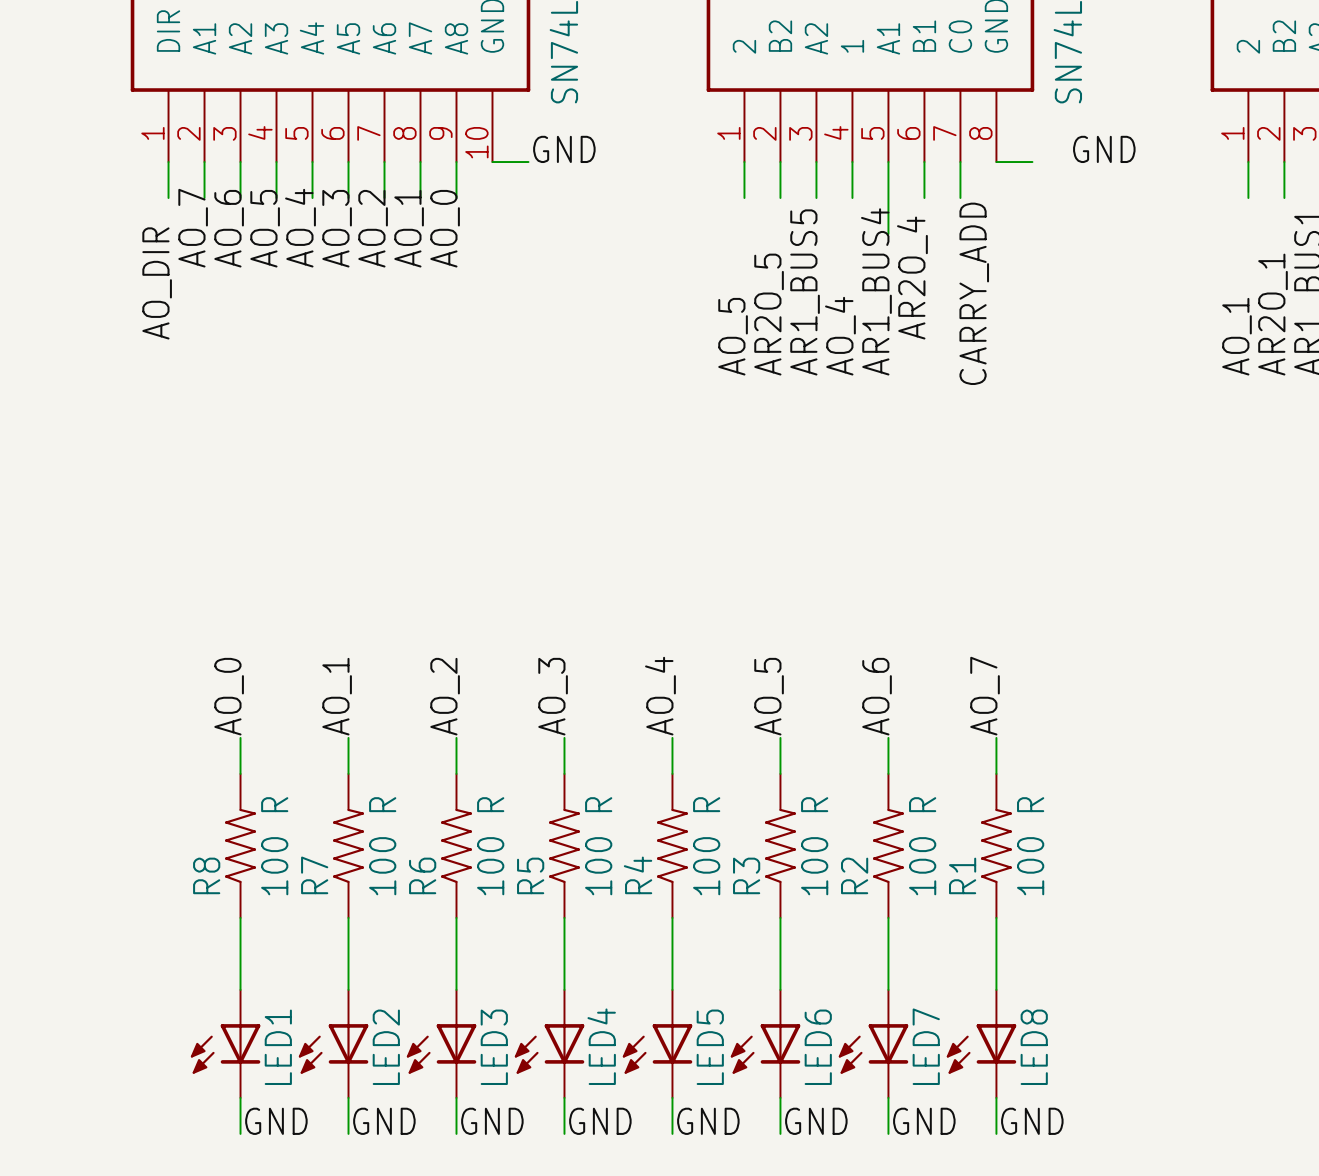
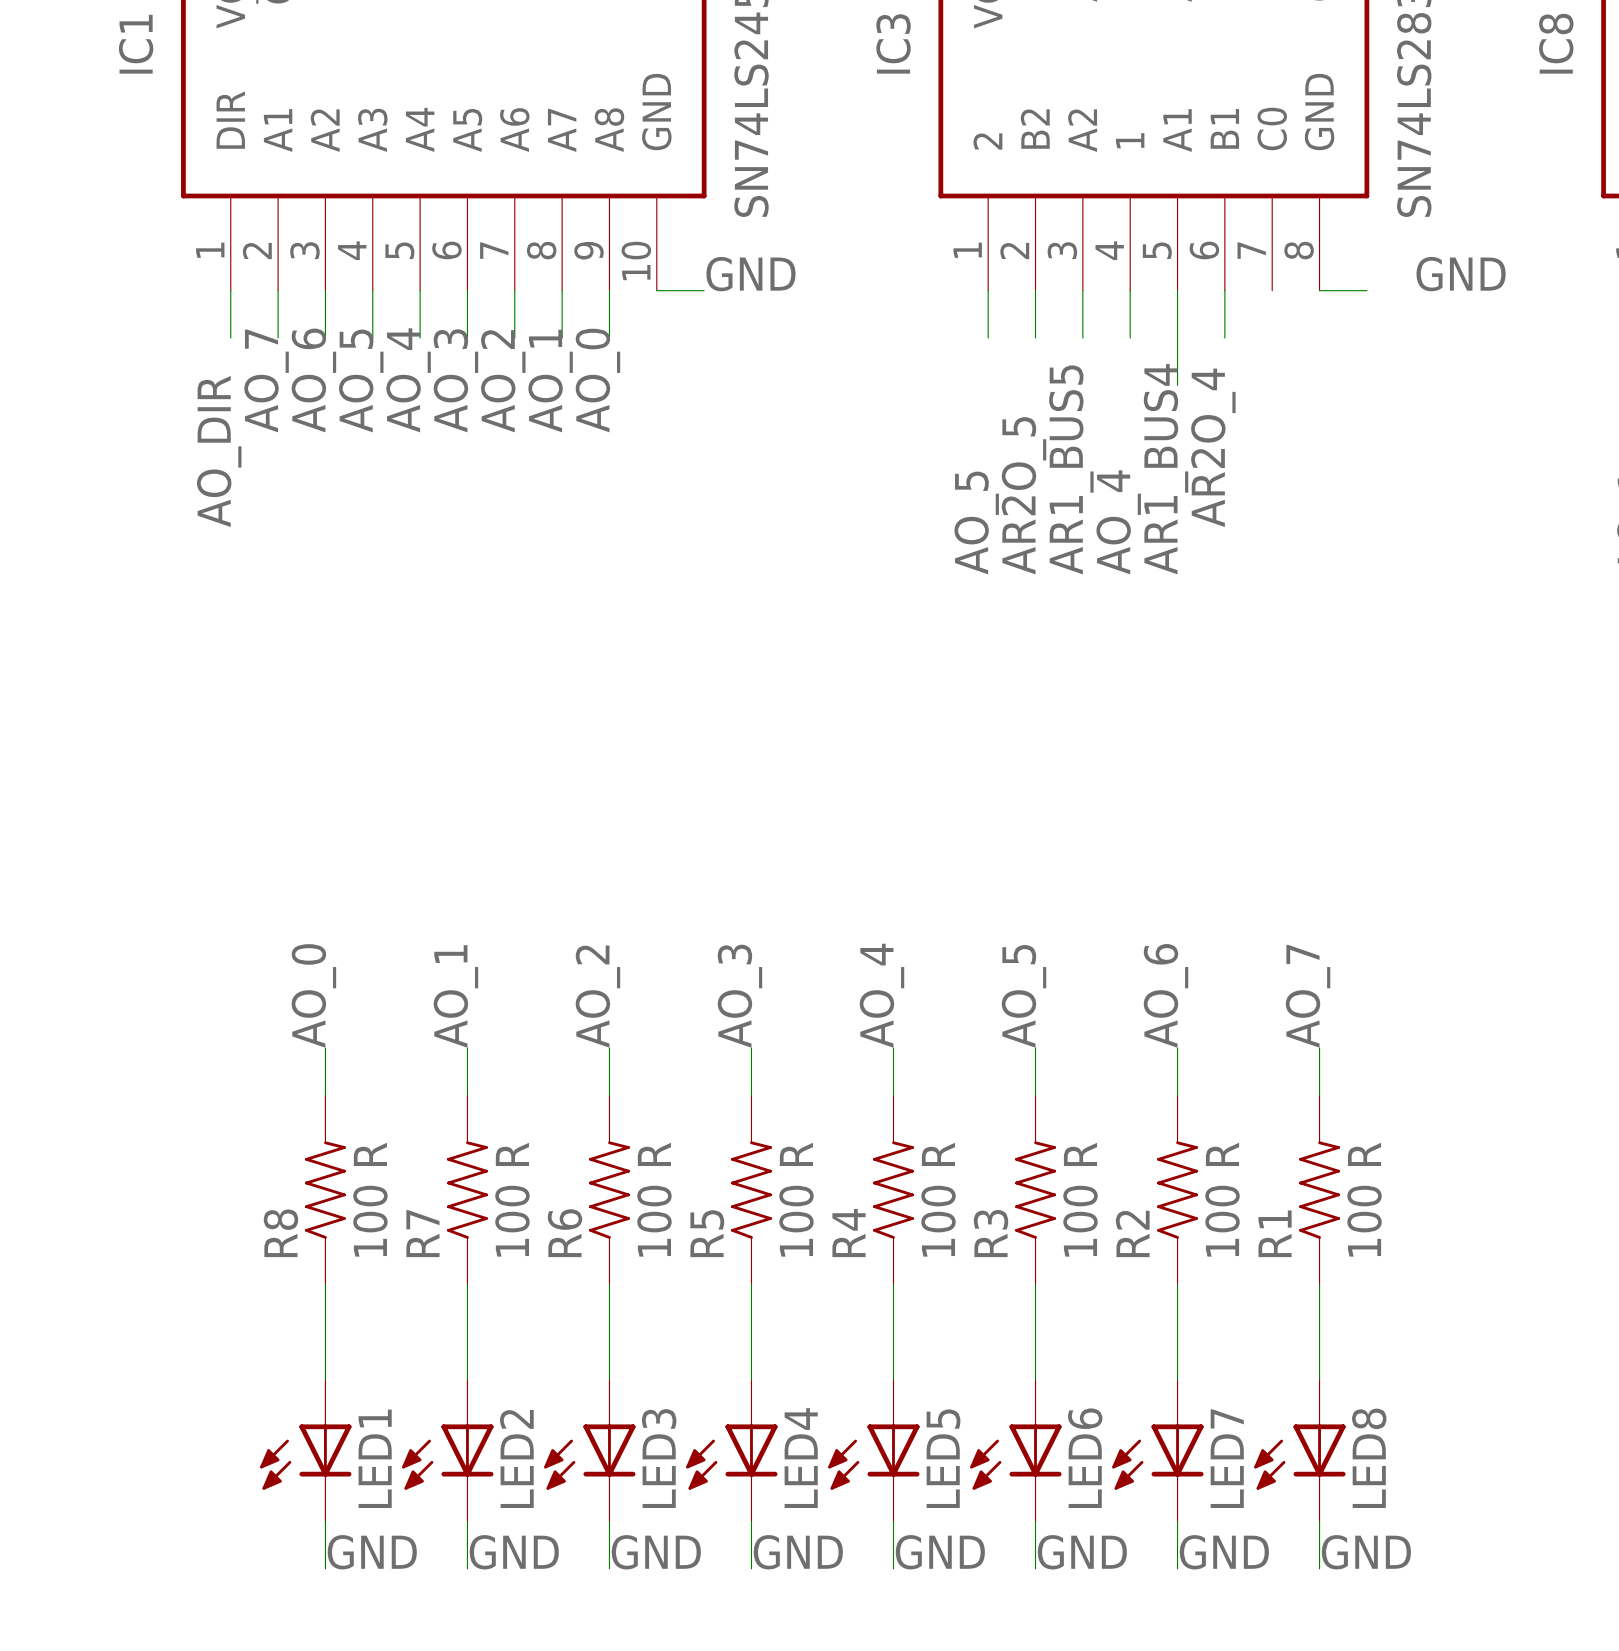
wire: (960, 162) (960, 198) -> none
label: CARRY_ADD (974, 293) -> none

